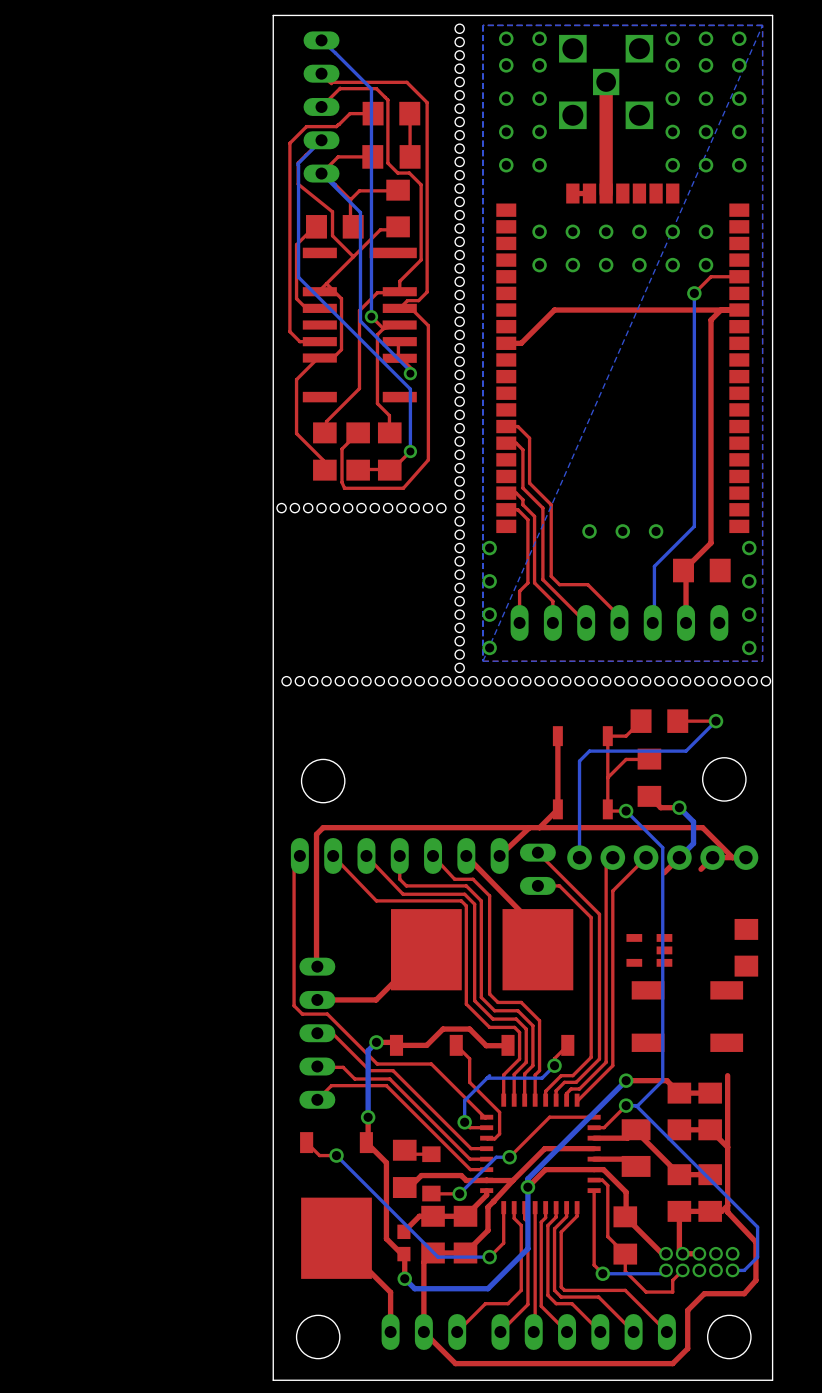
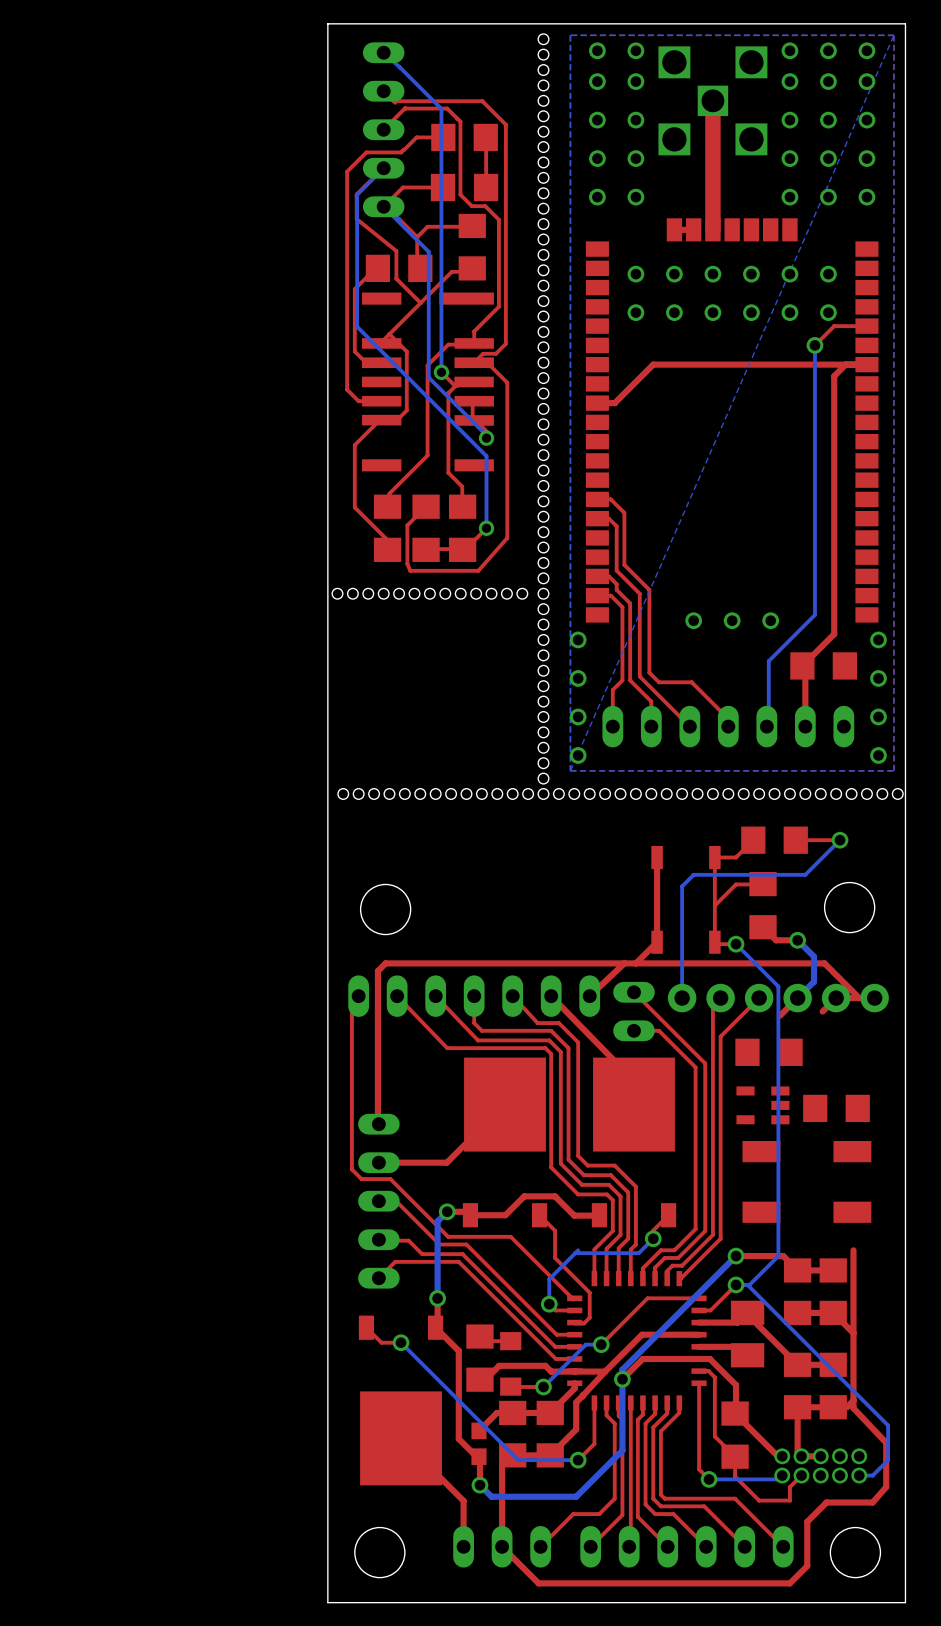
part: none -> (769, 1052)
part rotation: 0° (746, 947) -> 90° clockwise (836, 1108)

